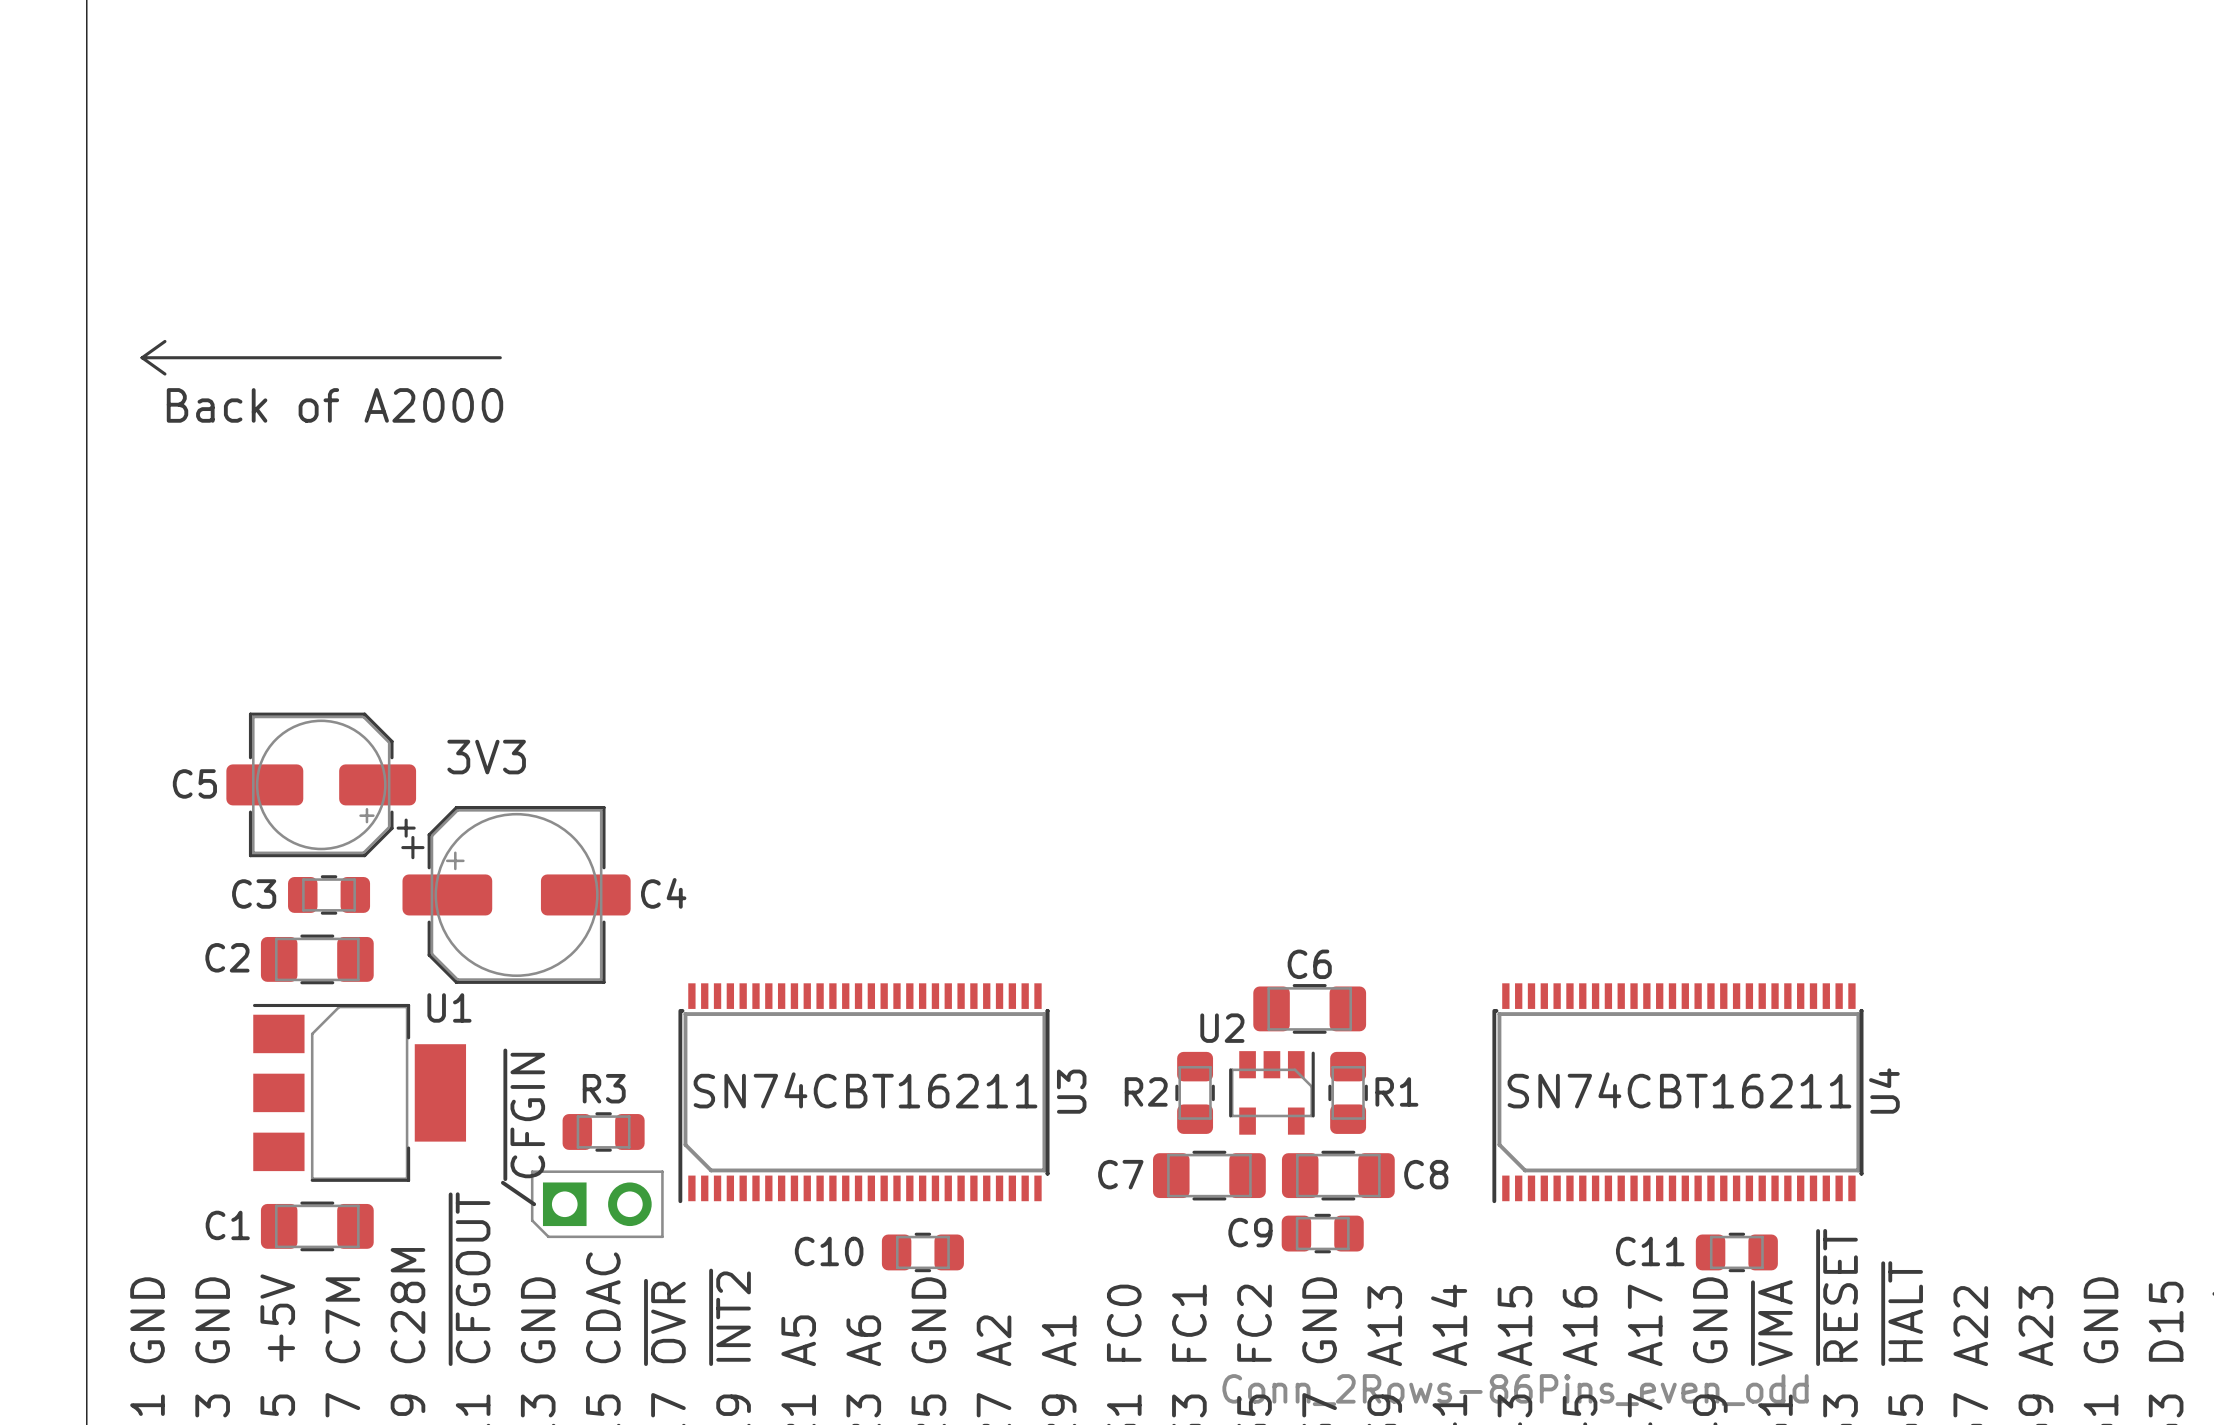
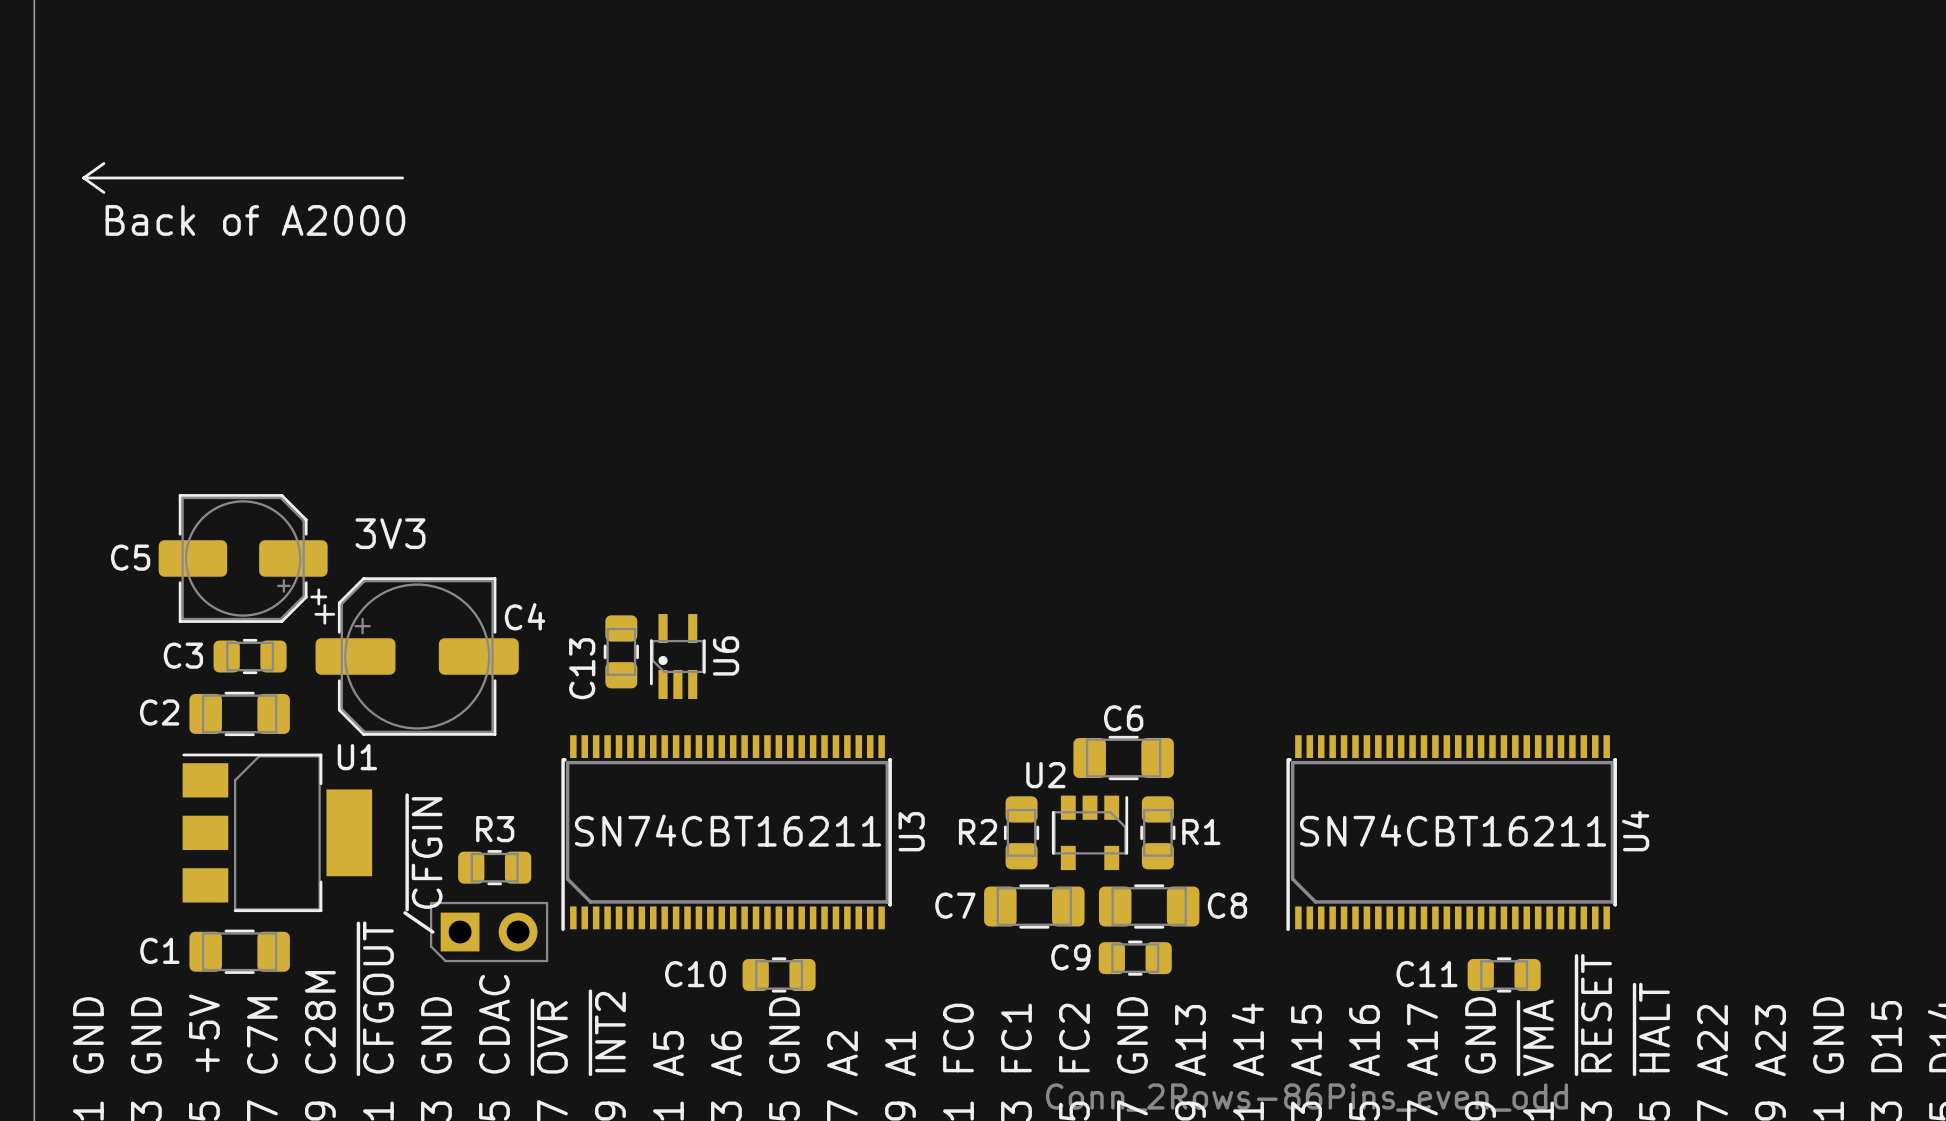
C13: none -> (621, 651)
C4 name position: C4 (663, 893) -> C4 (525, 616)
U6: none -> (677, 656)

